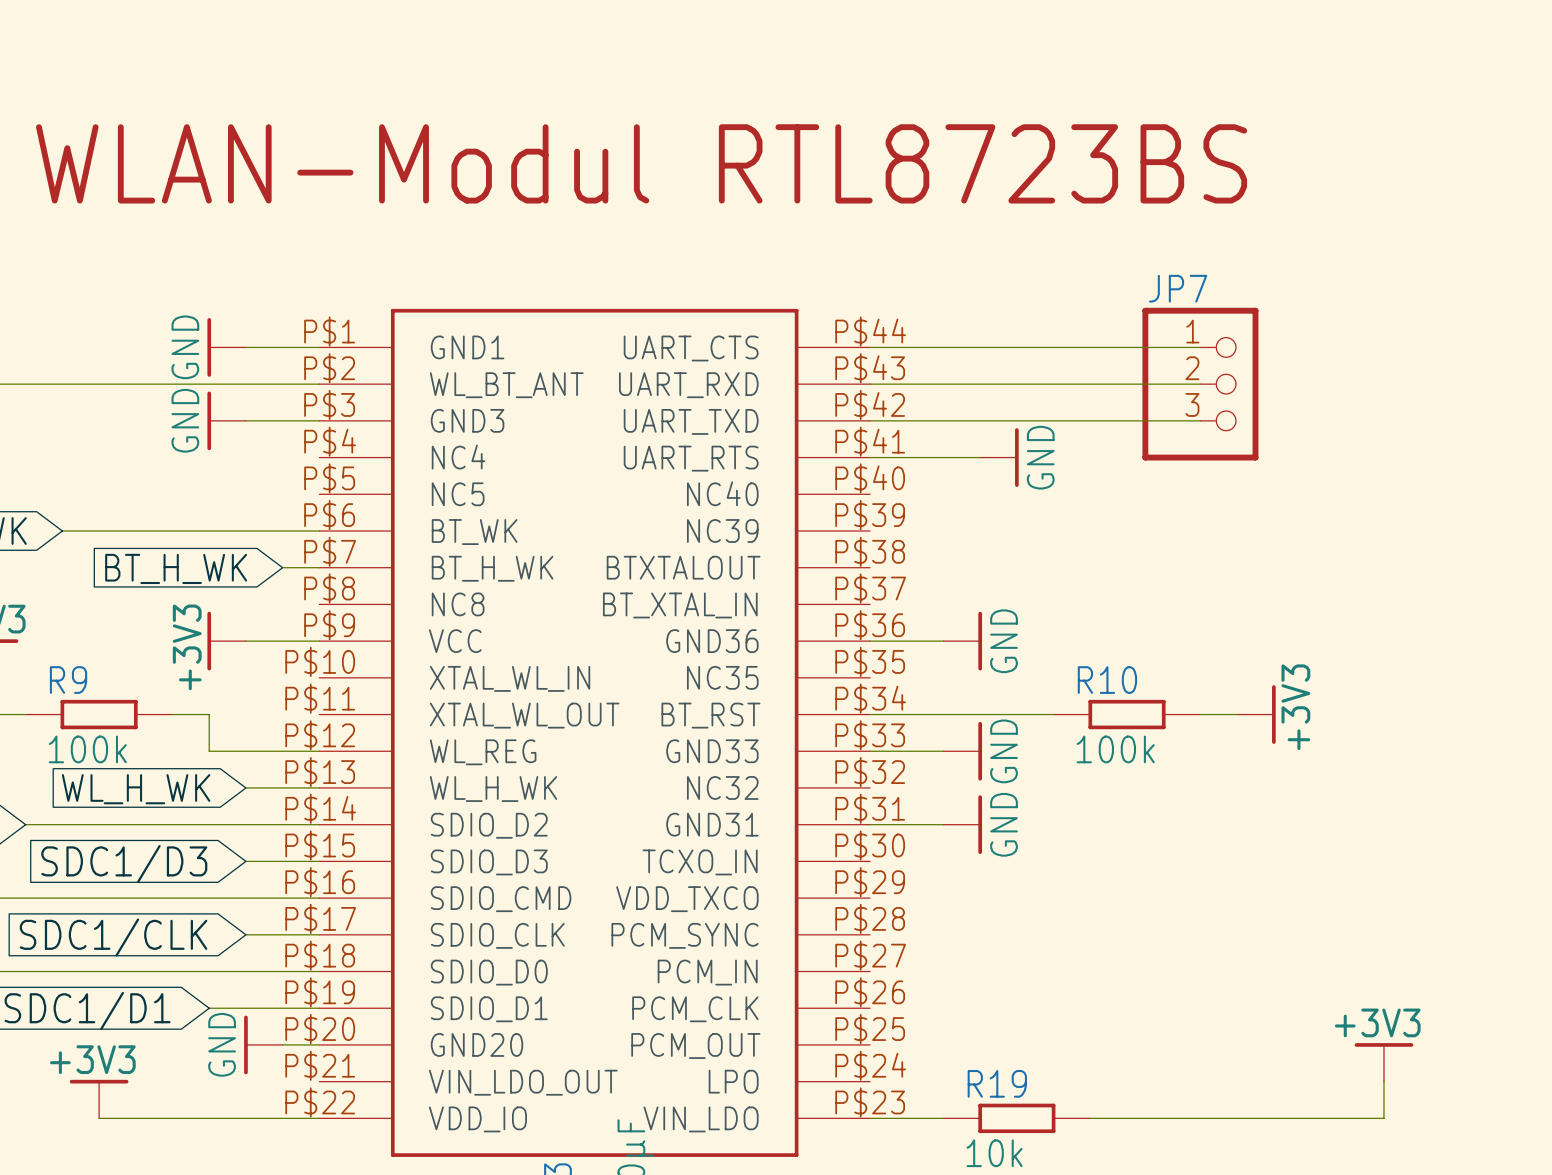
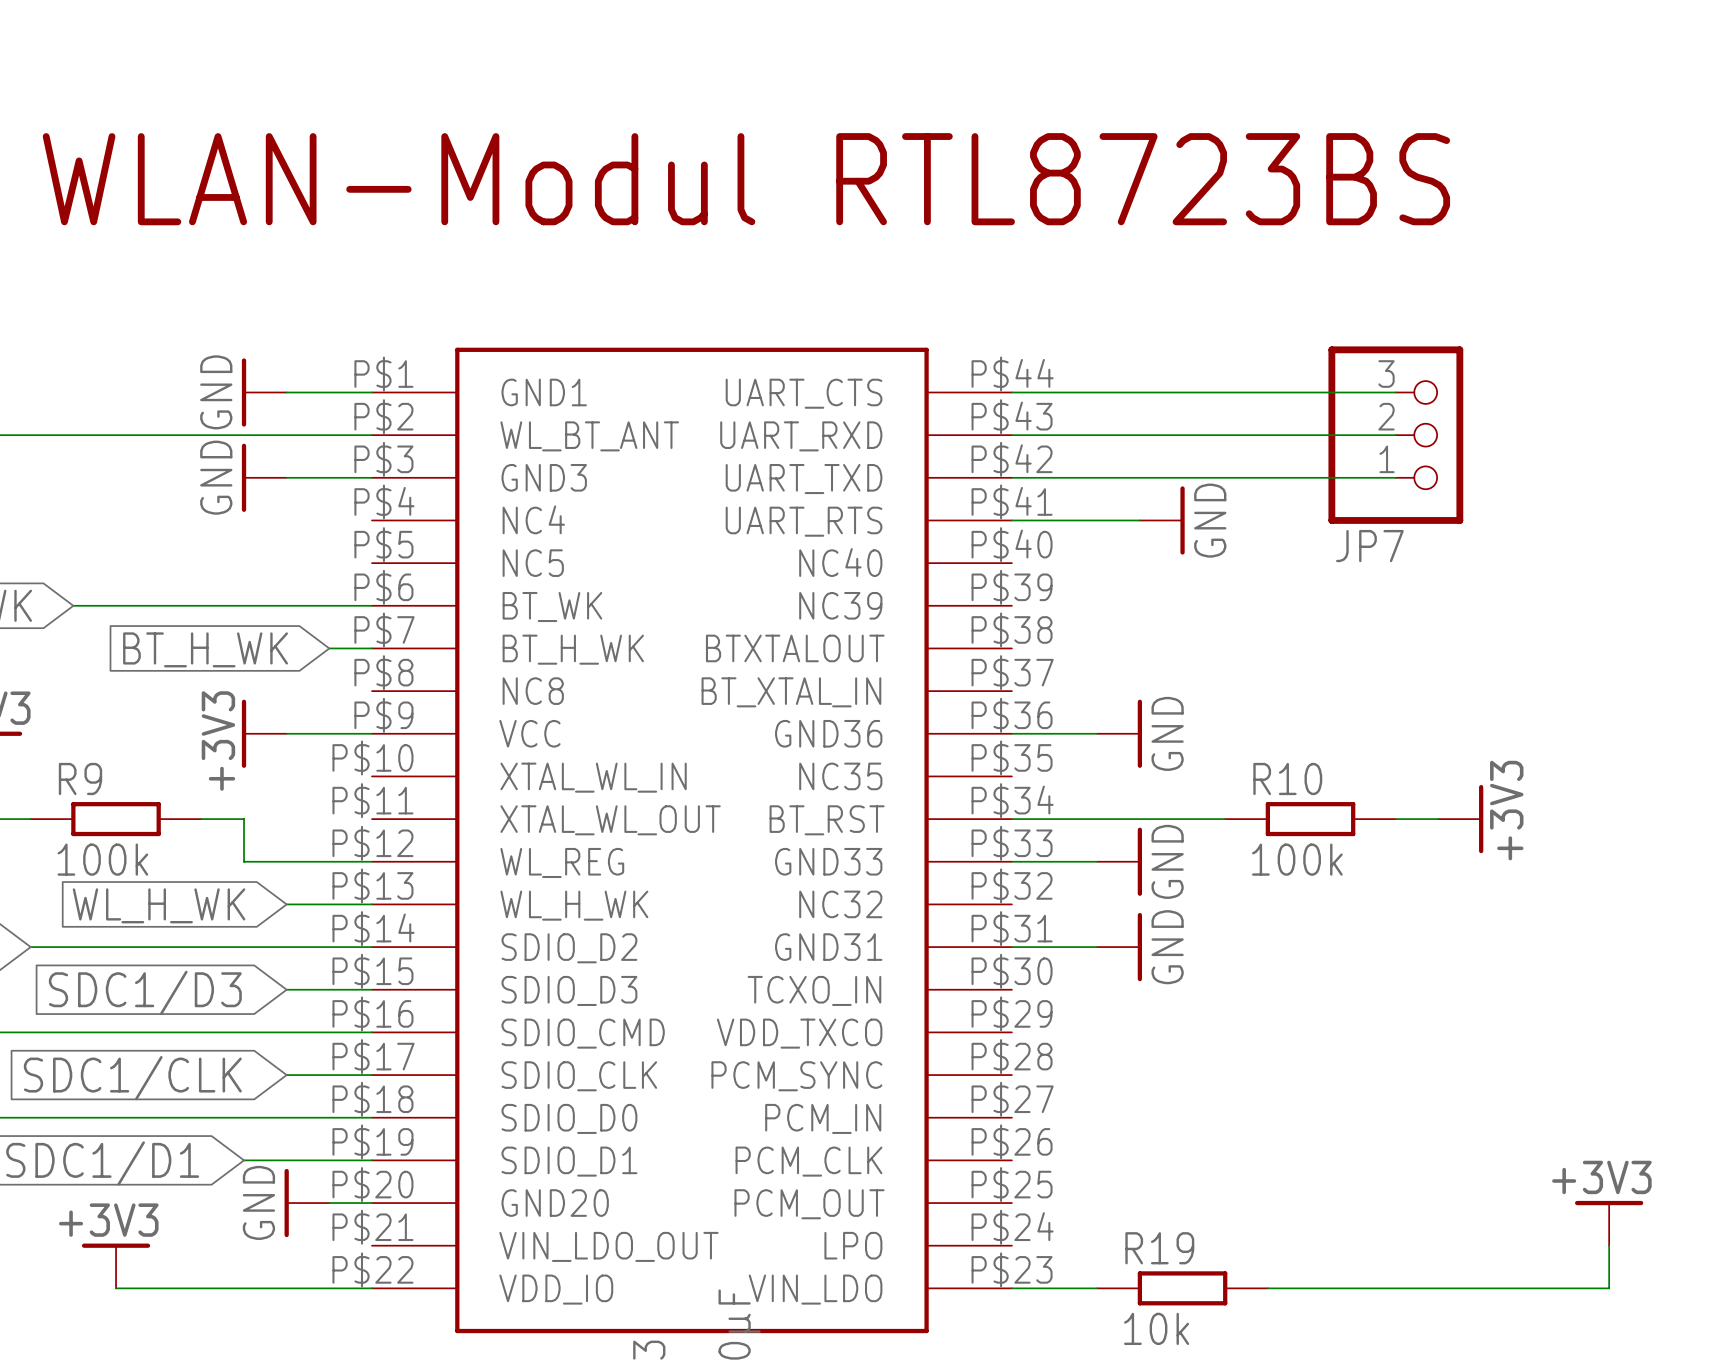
JP7 flip: as is (1200, 384) -> up-down (1395, 435)

